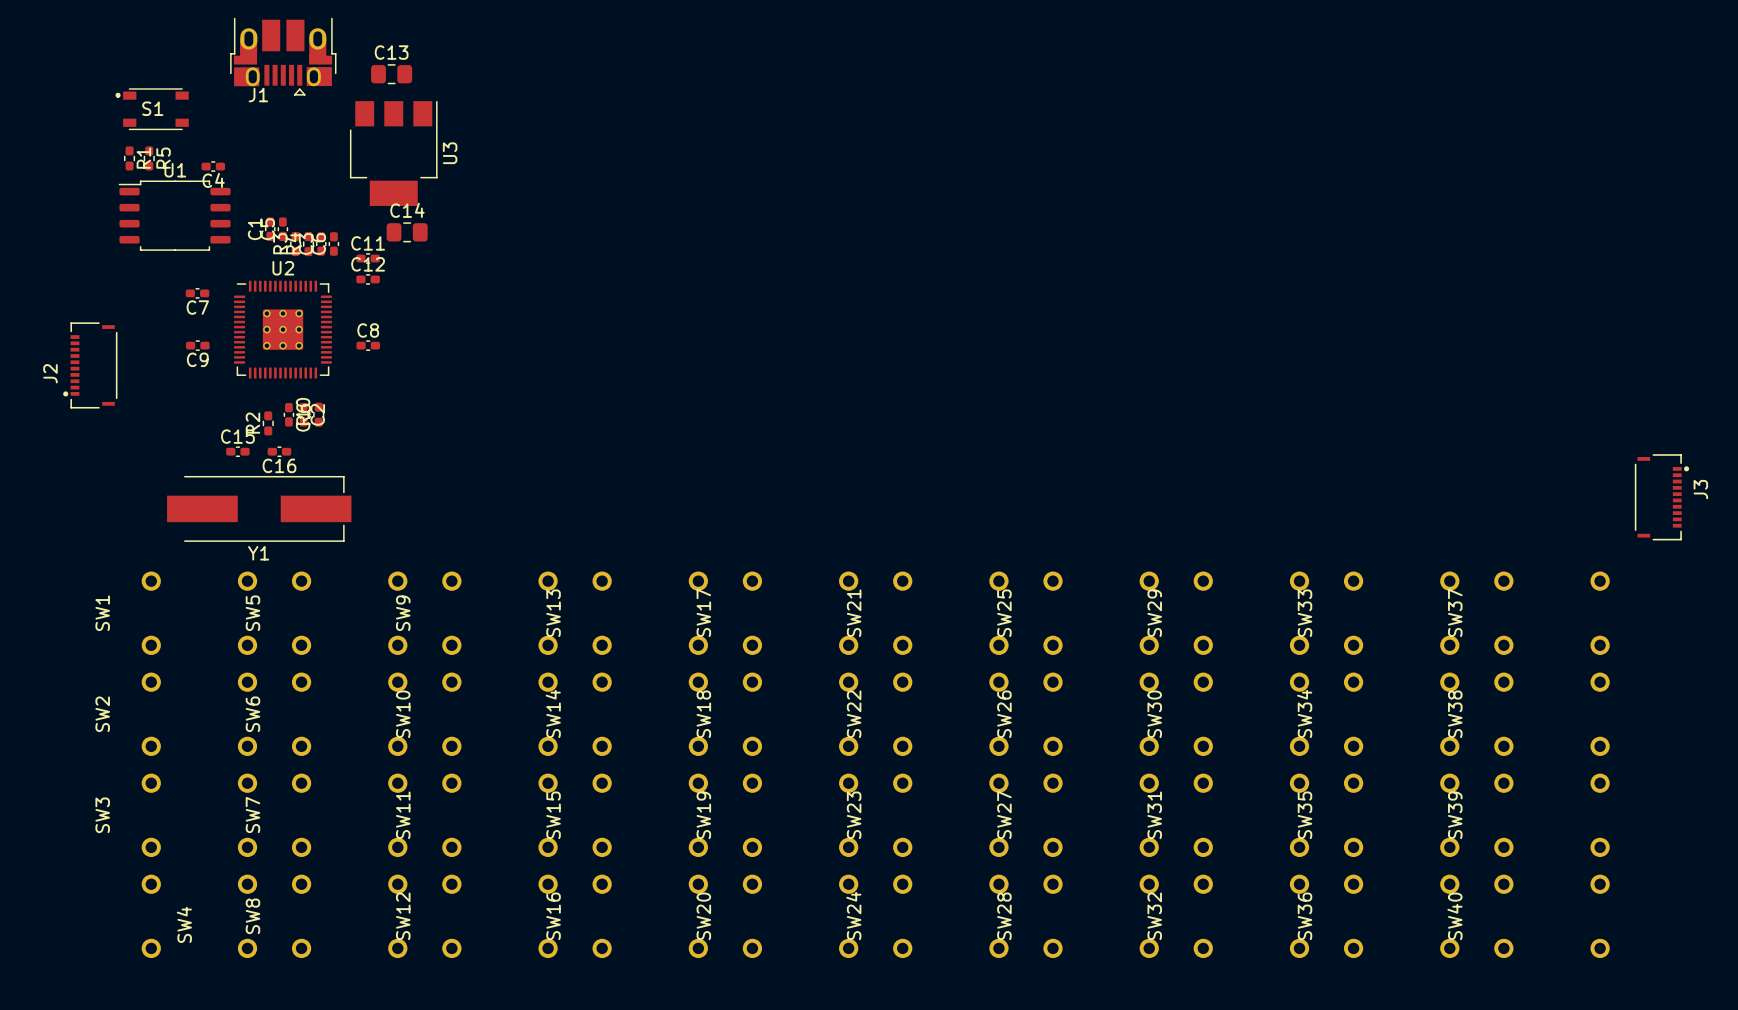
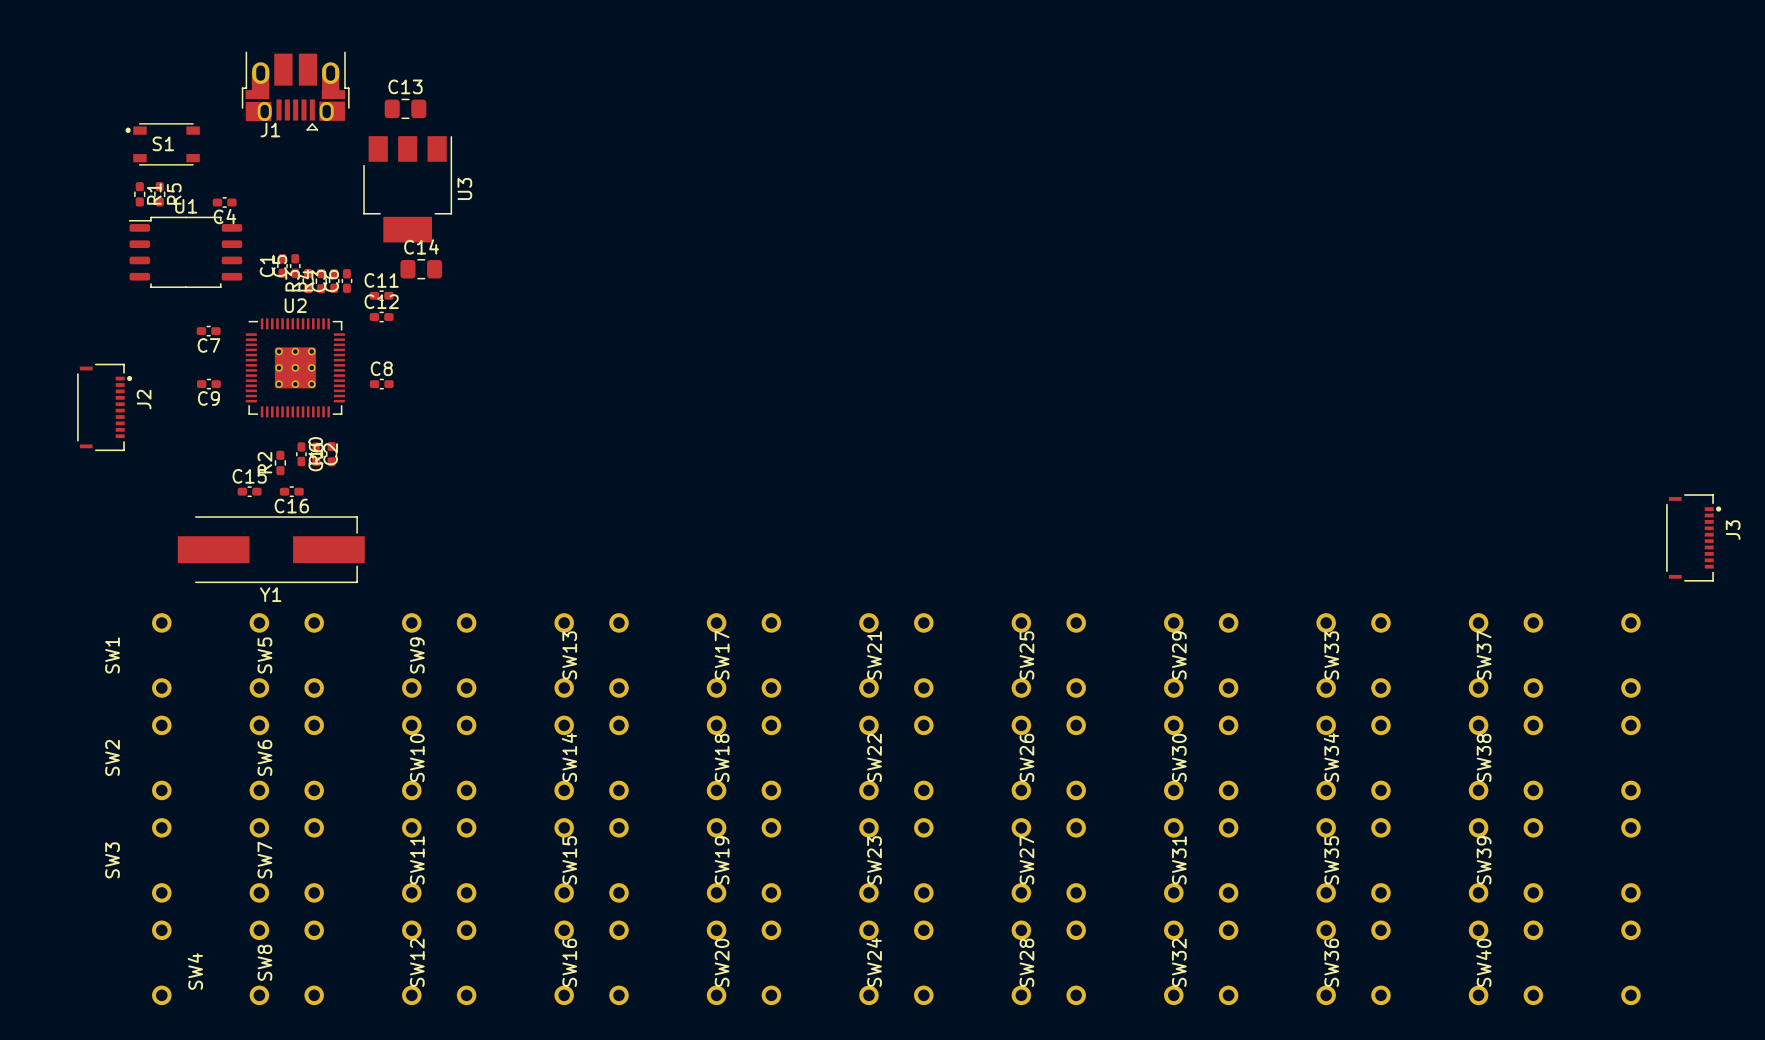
J2 rotation: 0° (90, 365) -> 180° (104, 407)

